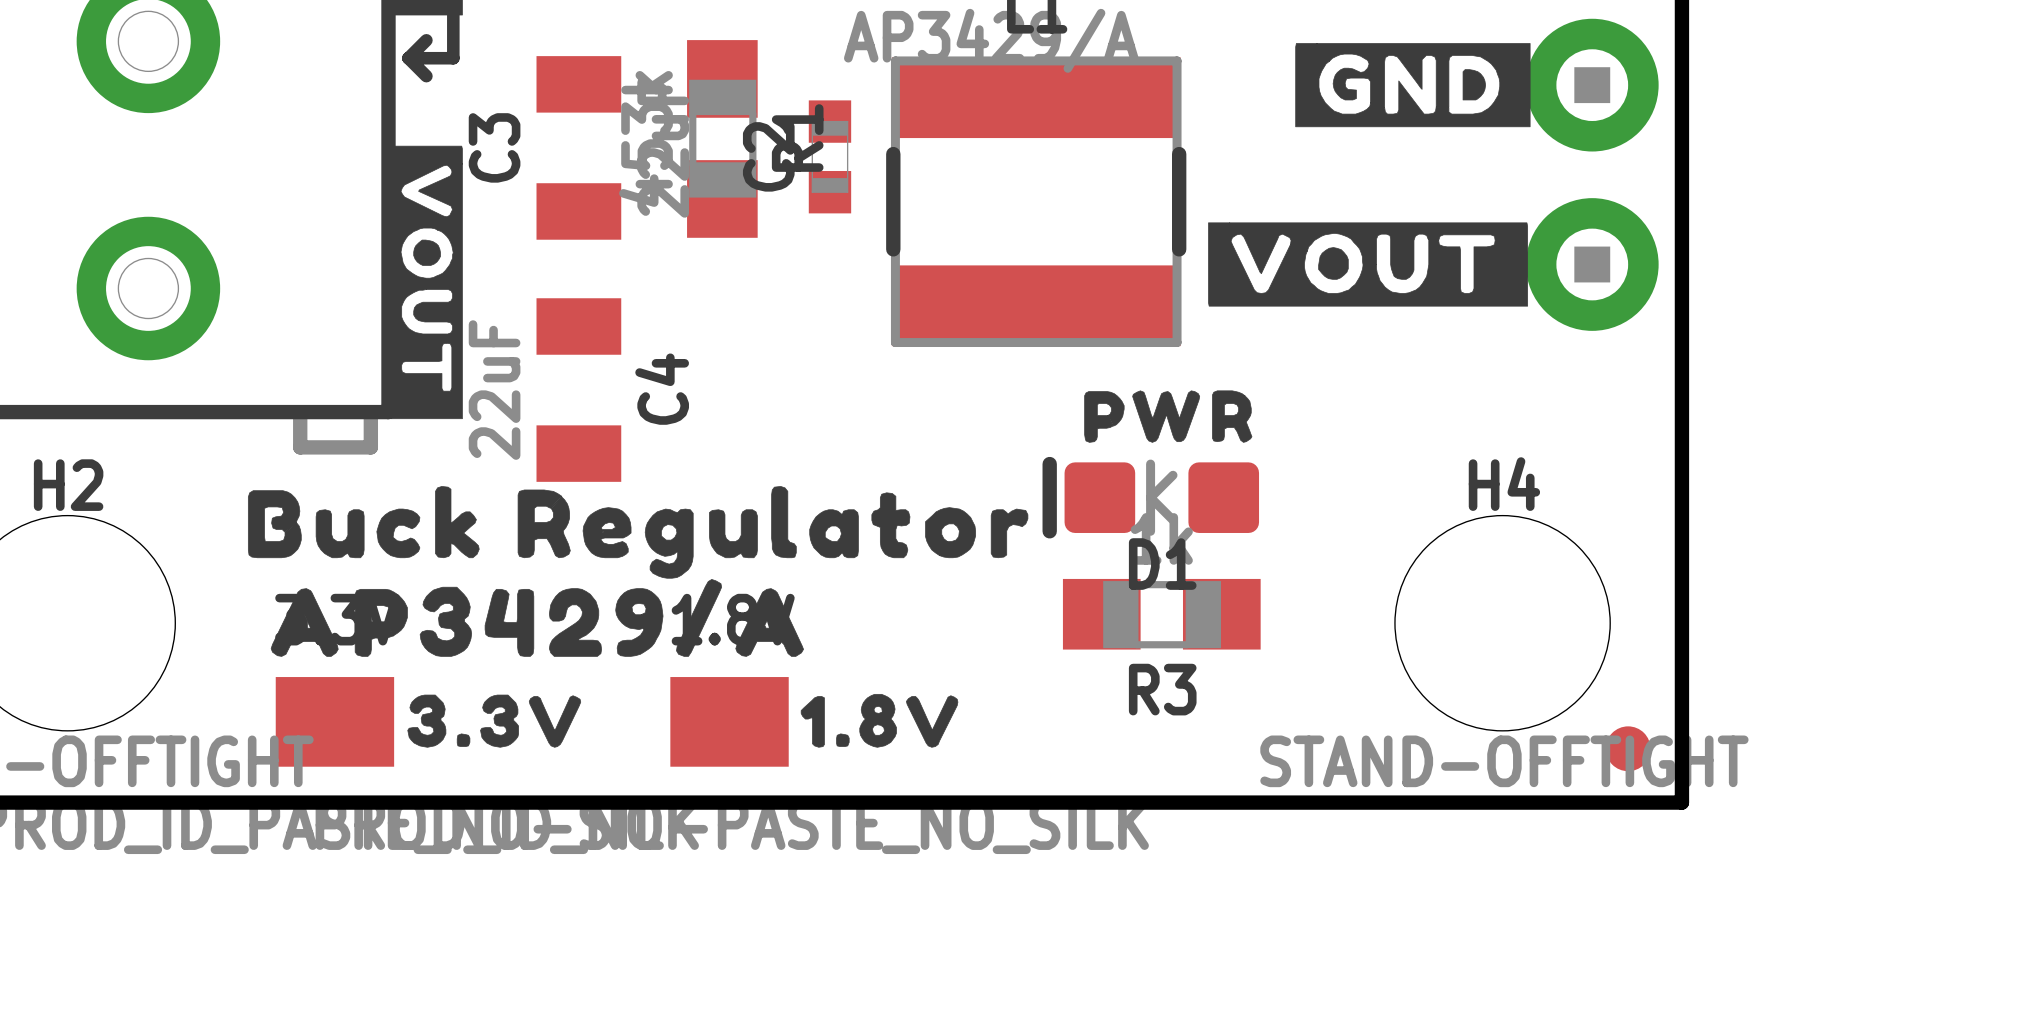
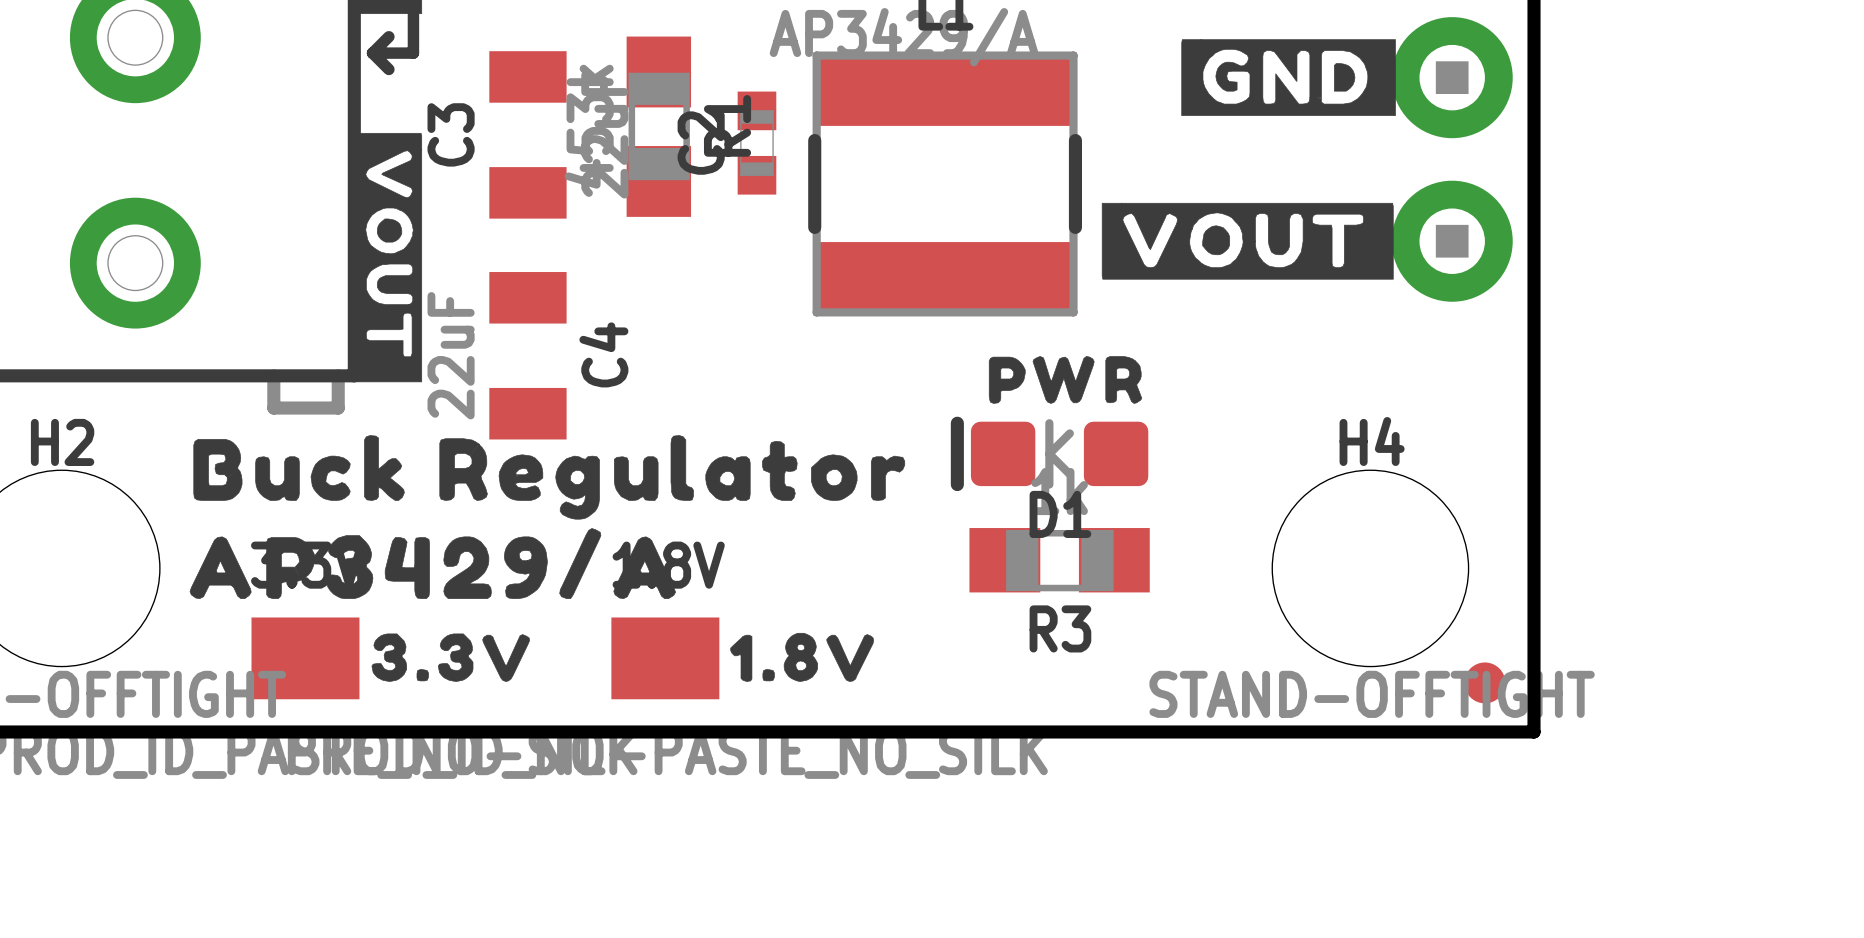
drawing position: (638, 532) -> (549, 477)
drawing position: (537, 617) -> (432, 563)

